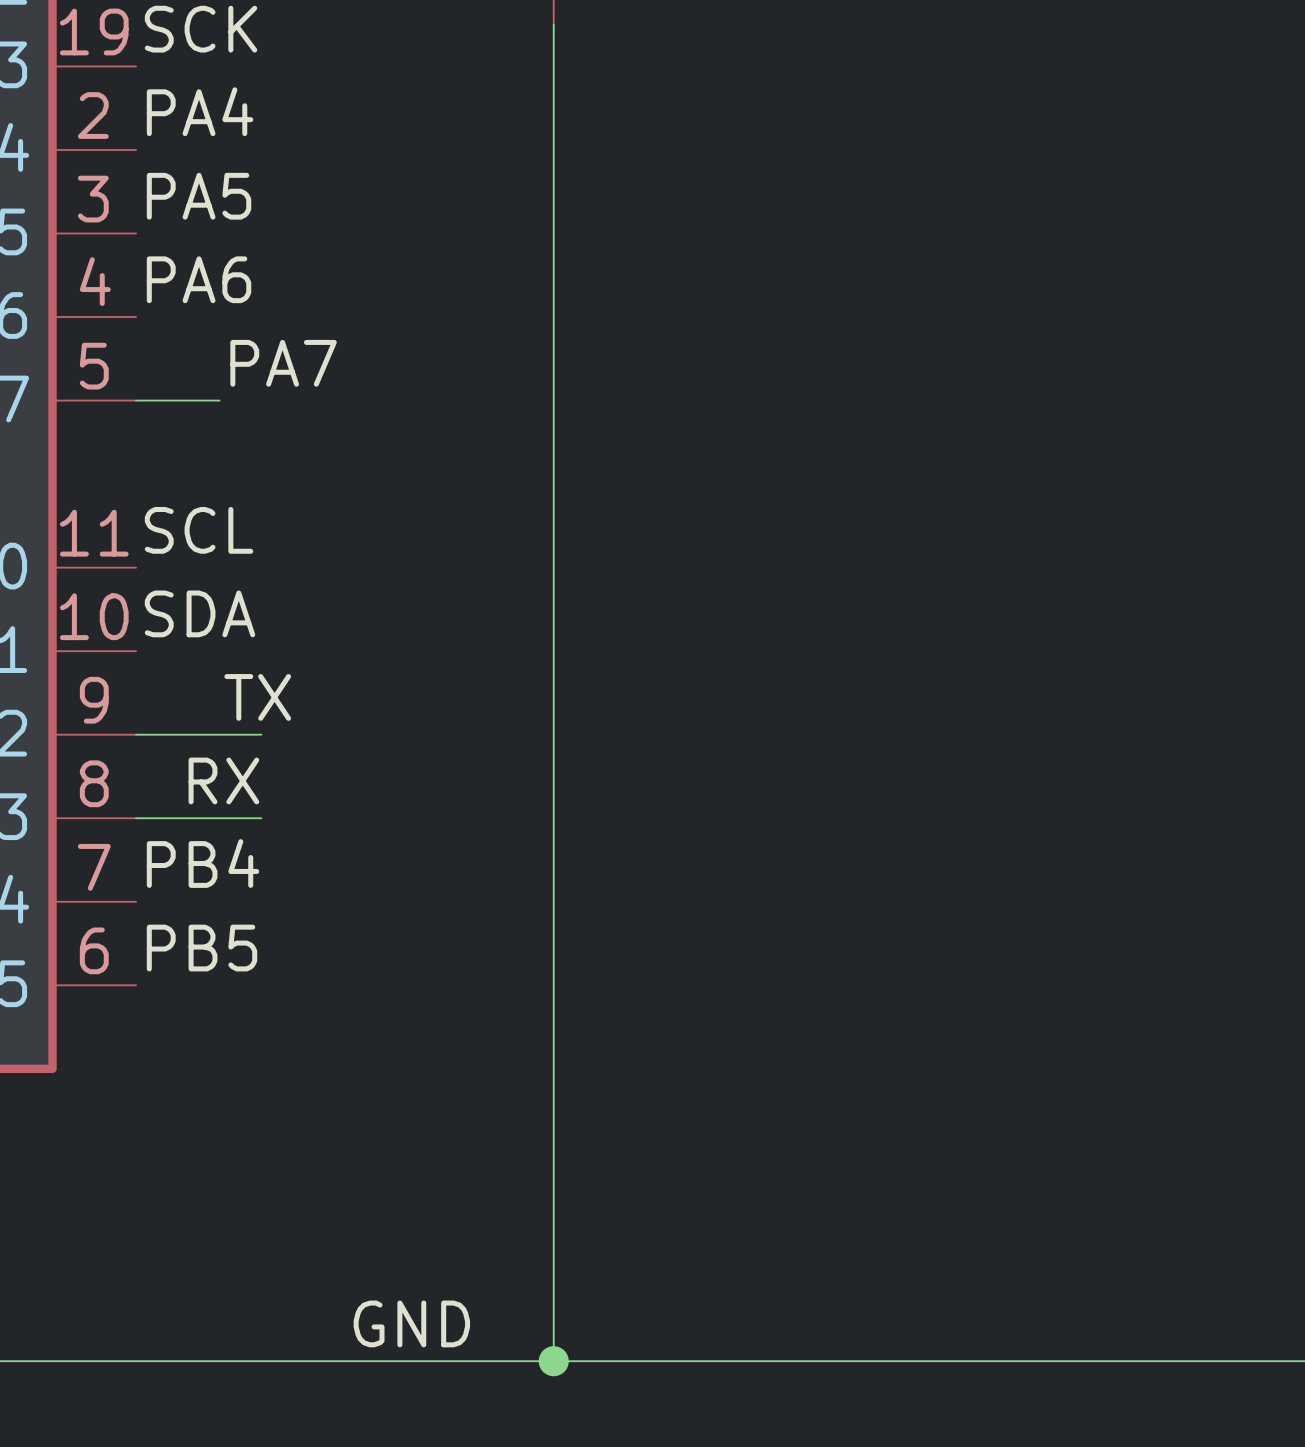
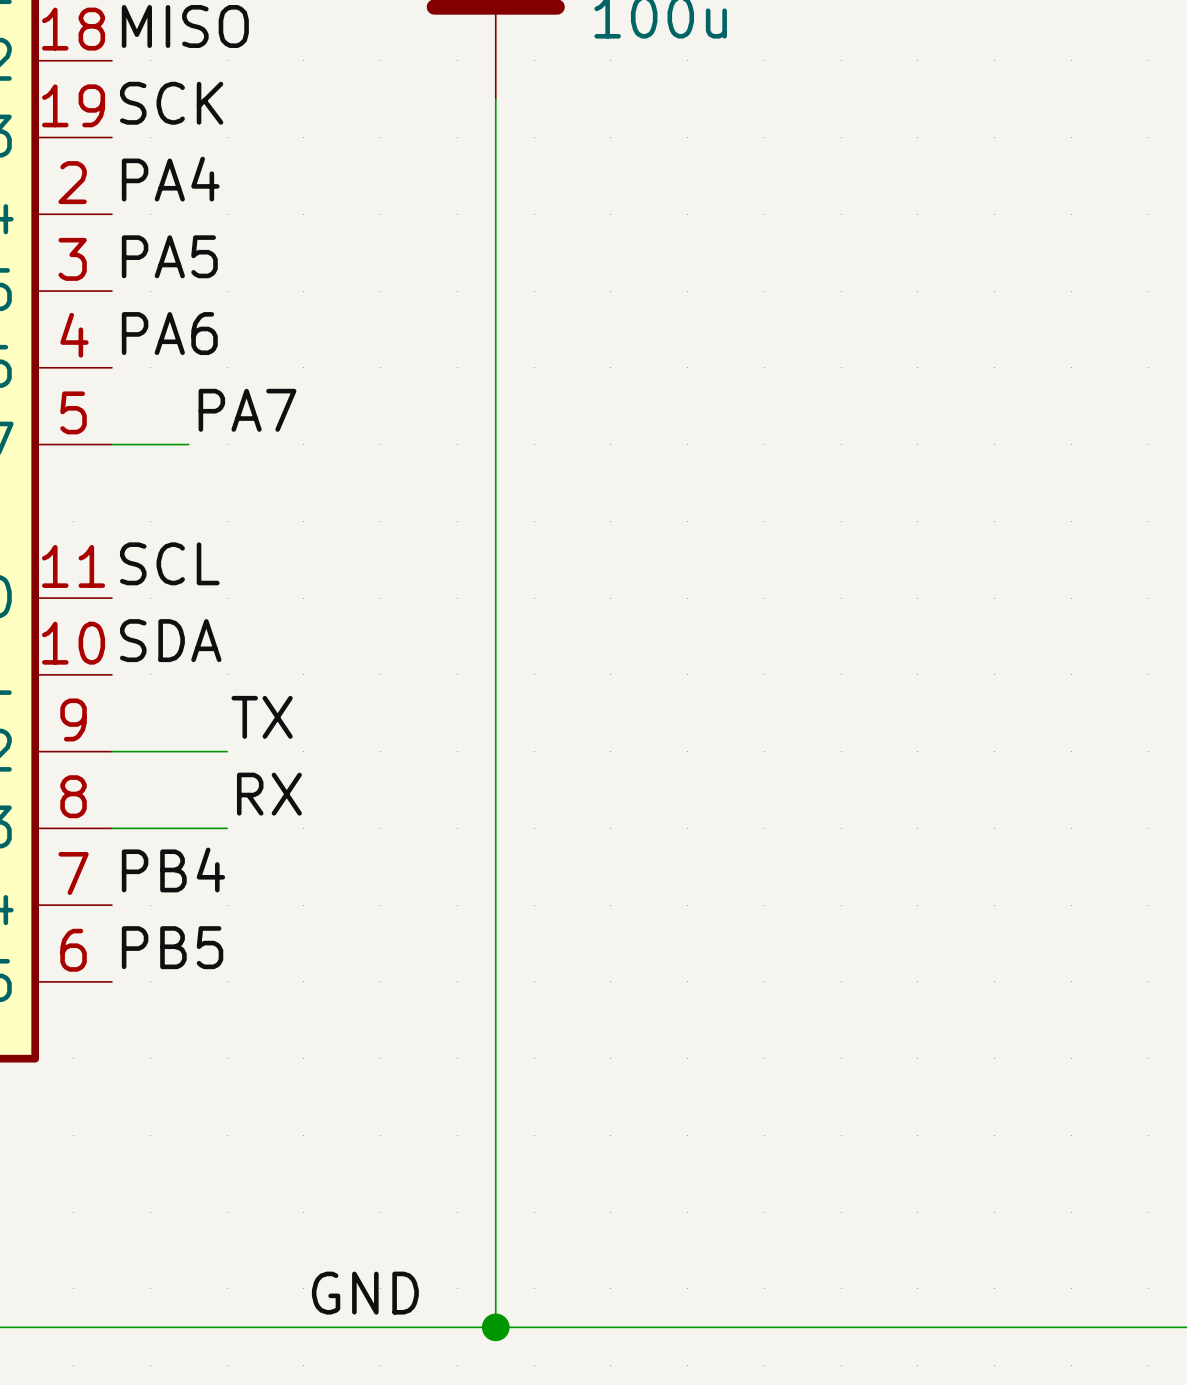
label position: TX (257, 697) -> TX (262, 717)
label position: RX (223, 780) -> RX (269, 794)

